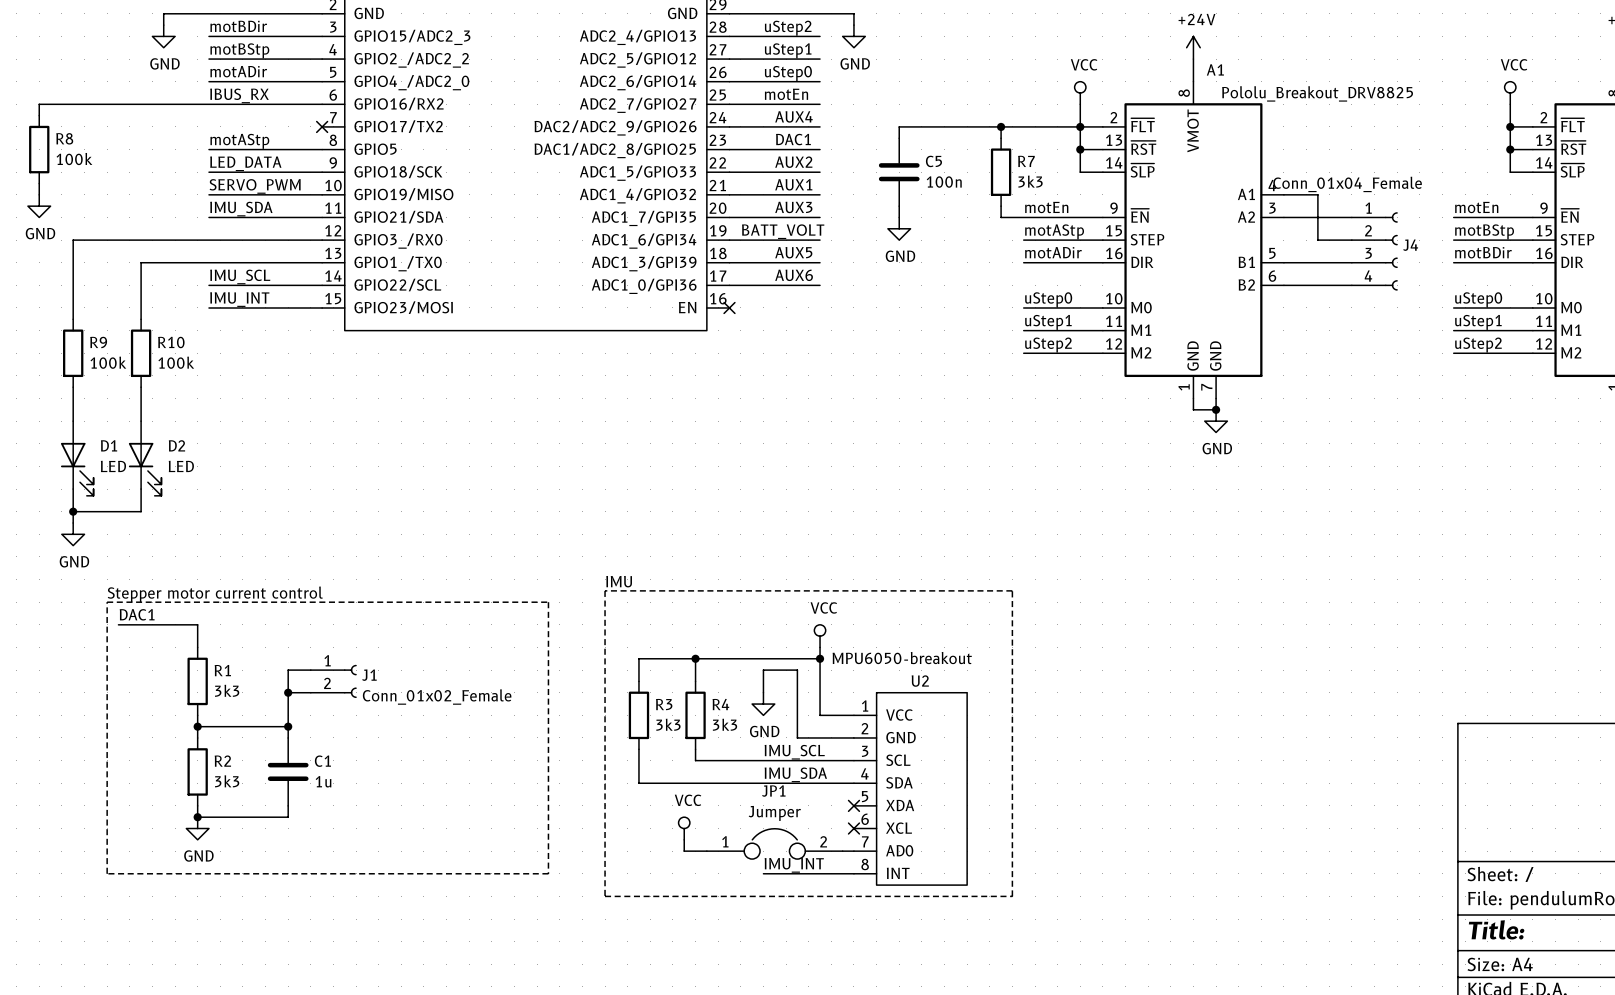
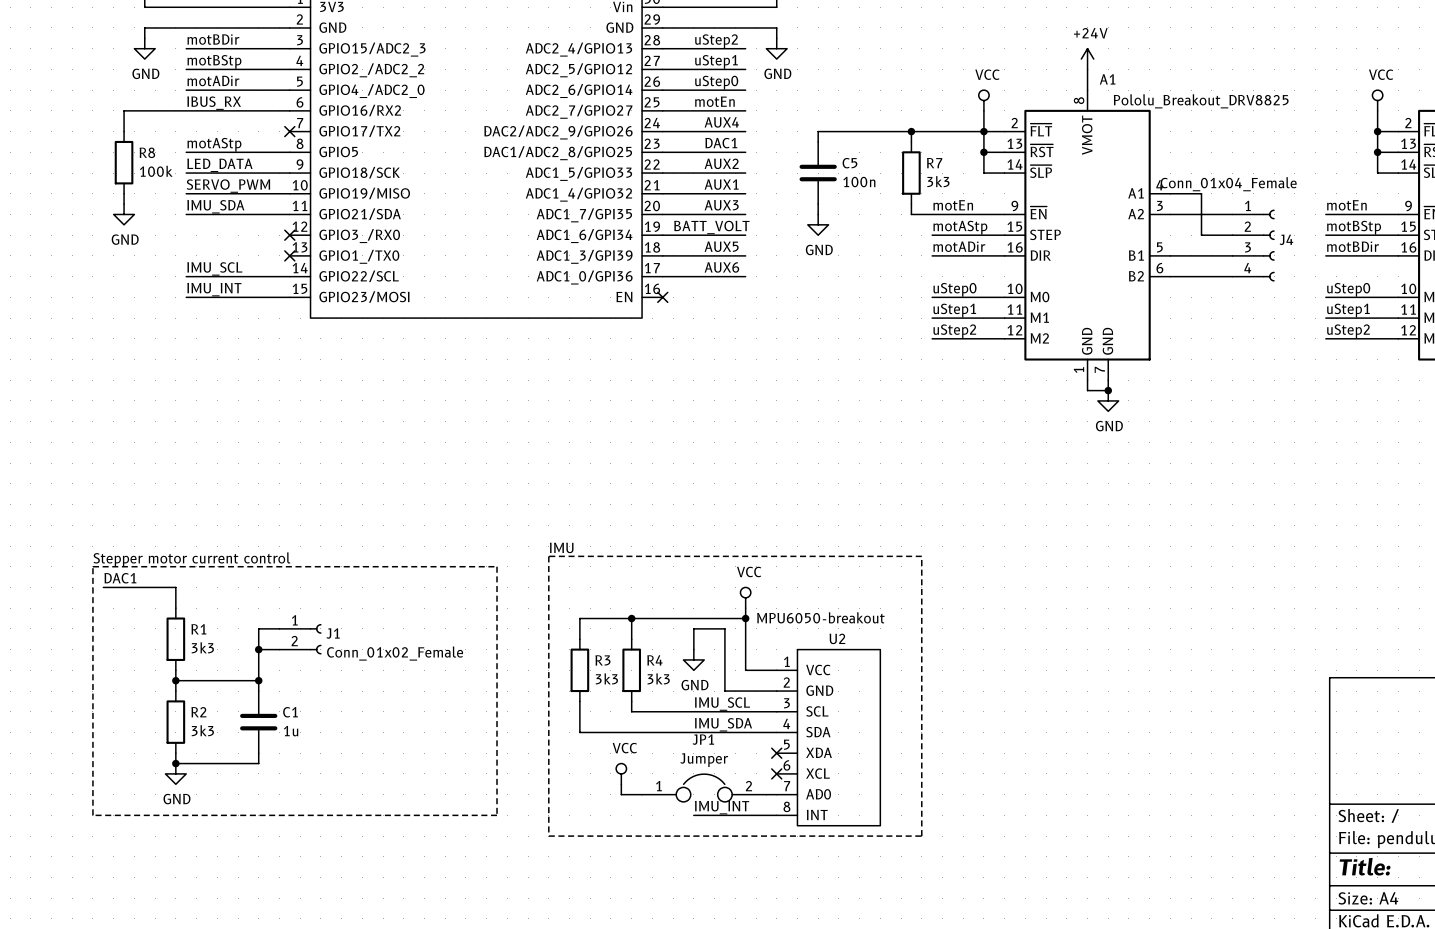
wire: (141, 104) (39, 104) (39, 115) -> (124, 110) (124, 131)
R8 position: (39, 149) -> (124, 162)
wire: (39, 183) (39, 194) -> (124, 193) (124, 204)
power symbol position: GND (39, 206) -> GND (124, 214)
wire: (322, 240) (73, 240) (73, 319) -> none
no-connect mark: none -> (289, 235)
wire: (322, 262) (141, 262) (141, 319) -> none
no-connect mark: none -> (289, 255)
R9: 100k (73, 353) -> none
R10: 100k (141, 353) -> none
wire: (73, 387) (73, 421) -> none
wire: (141, 387) (141, 421) -> none
D1: LED (77, 458) -> none
D2: LED (145, 458) -> none
wire: (73, 489) (73, 522) -> none
wire: (141, 489) (141, 511) (73, 511) -> none
junction: (73, 511) -> none
power symbol: GND (73, 534) -> none

